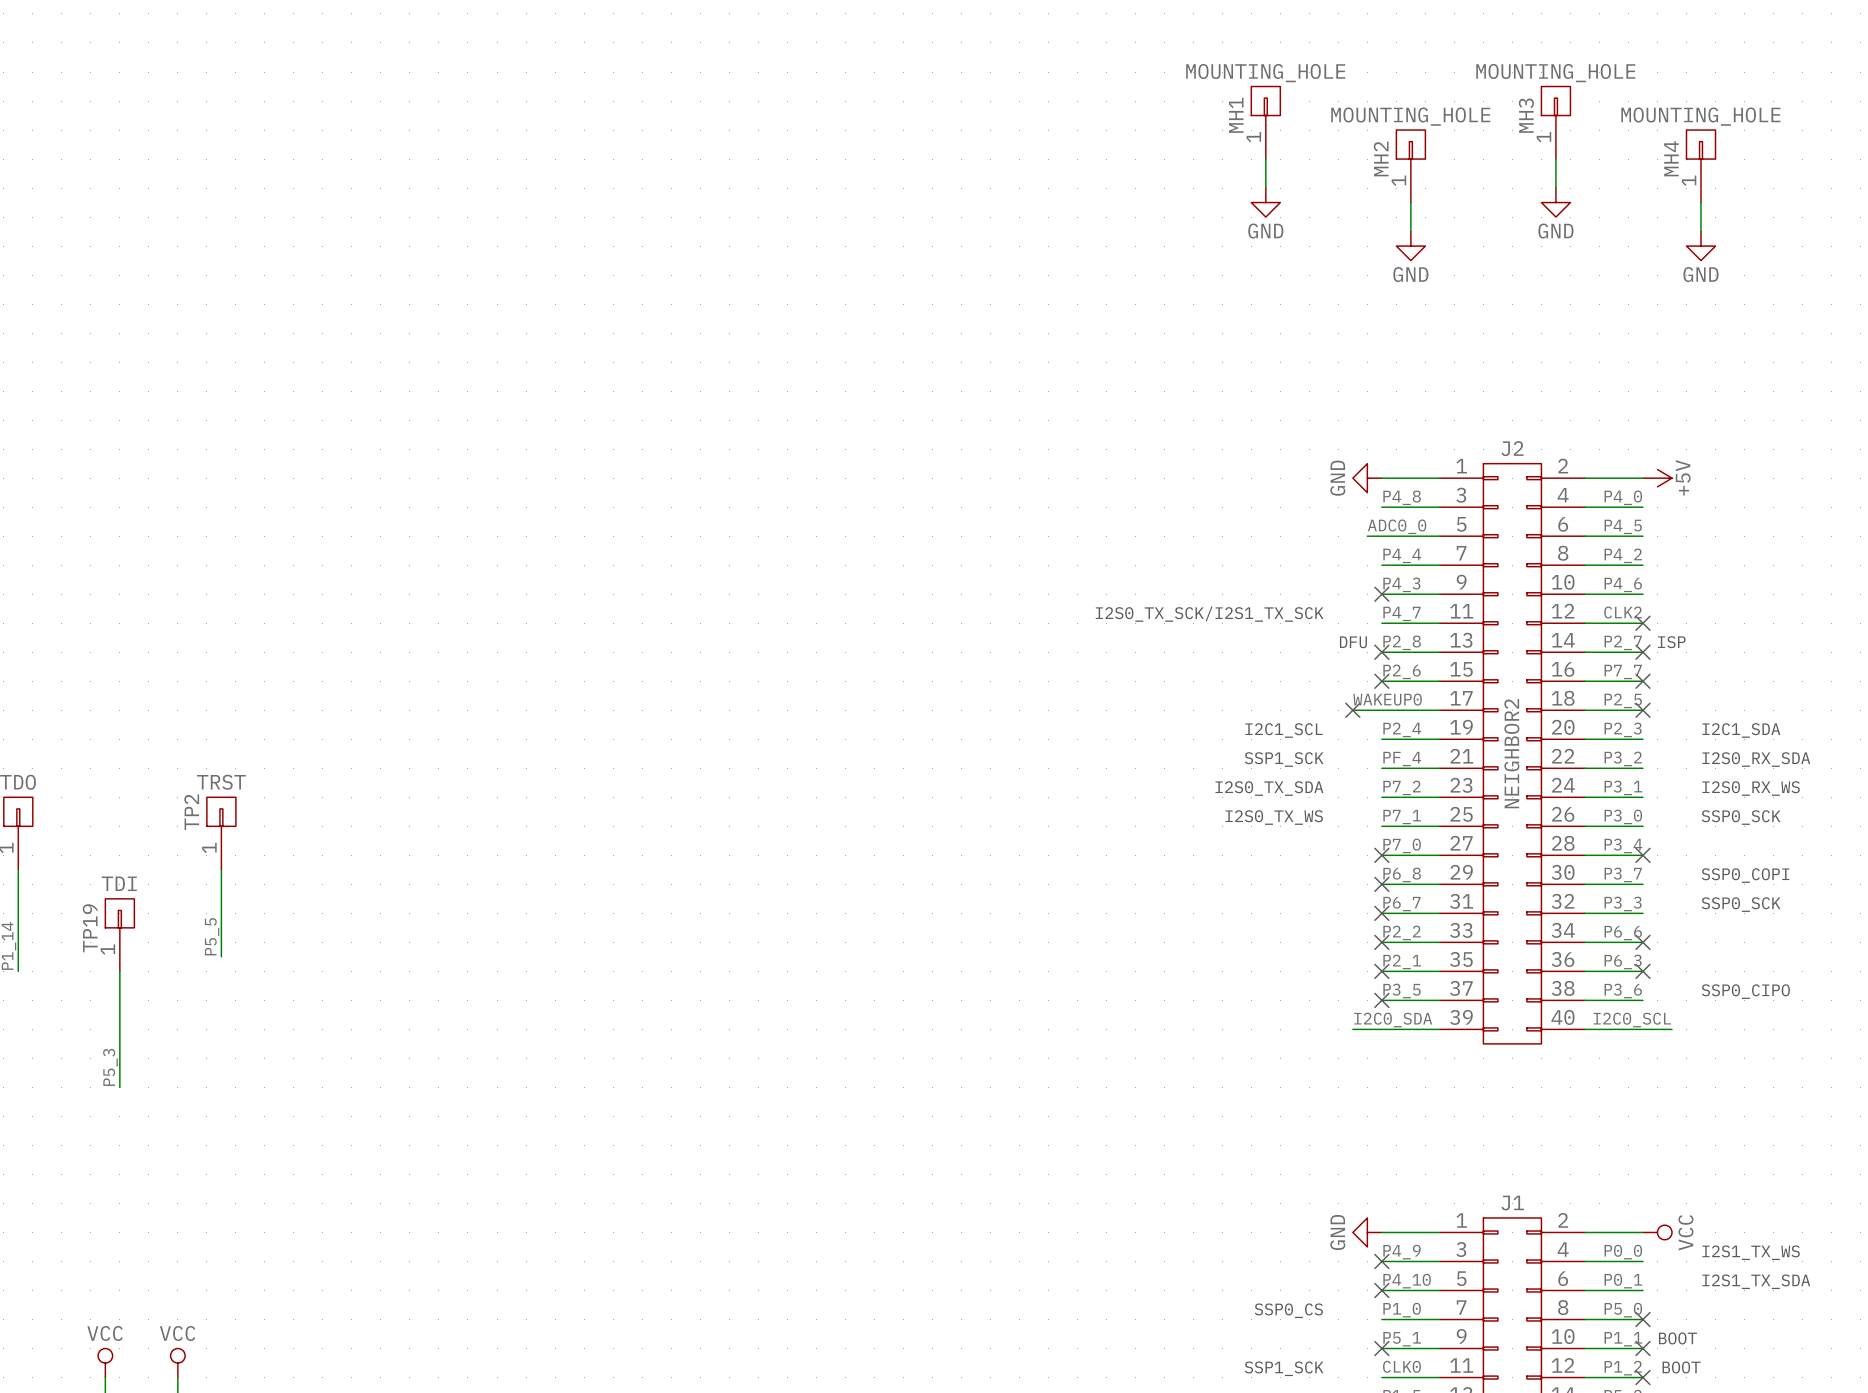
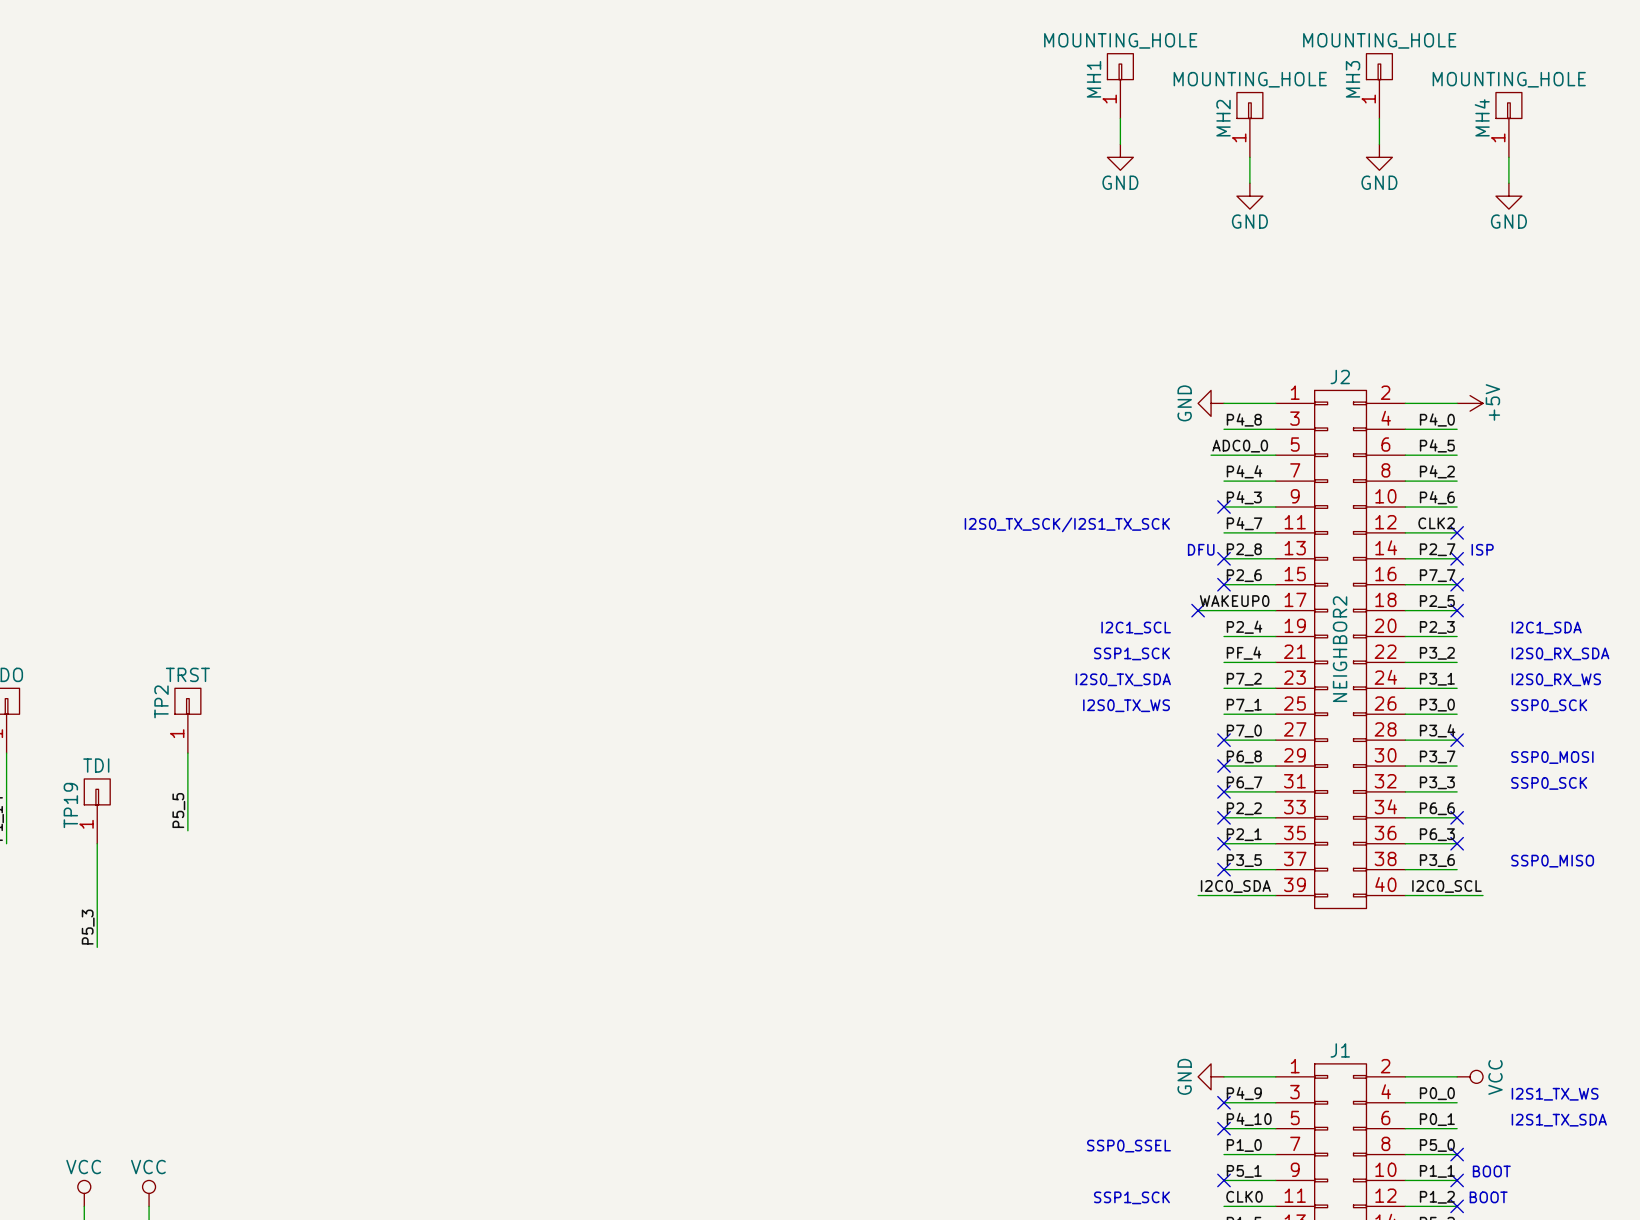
text: SSP0_COPI (1745, 875) -> SSP0_MOSI (1552, 757)
text: SSP0_CIPO (1745, 991) -> SSP0_MISO (1552, 861)
text: SSP0_CS (1288, 1310) -> SSP0_SSEL (1128, 1146)

